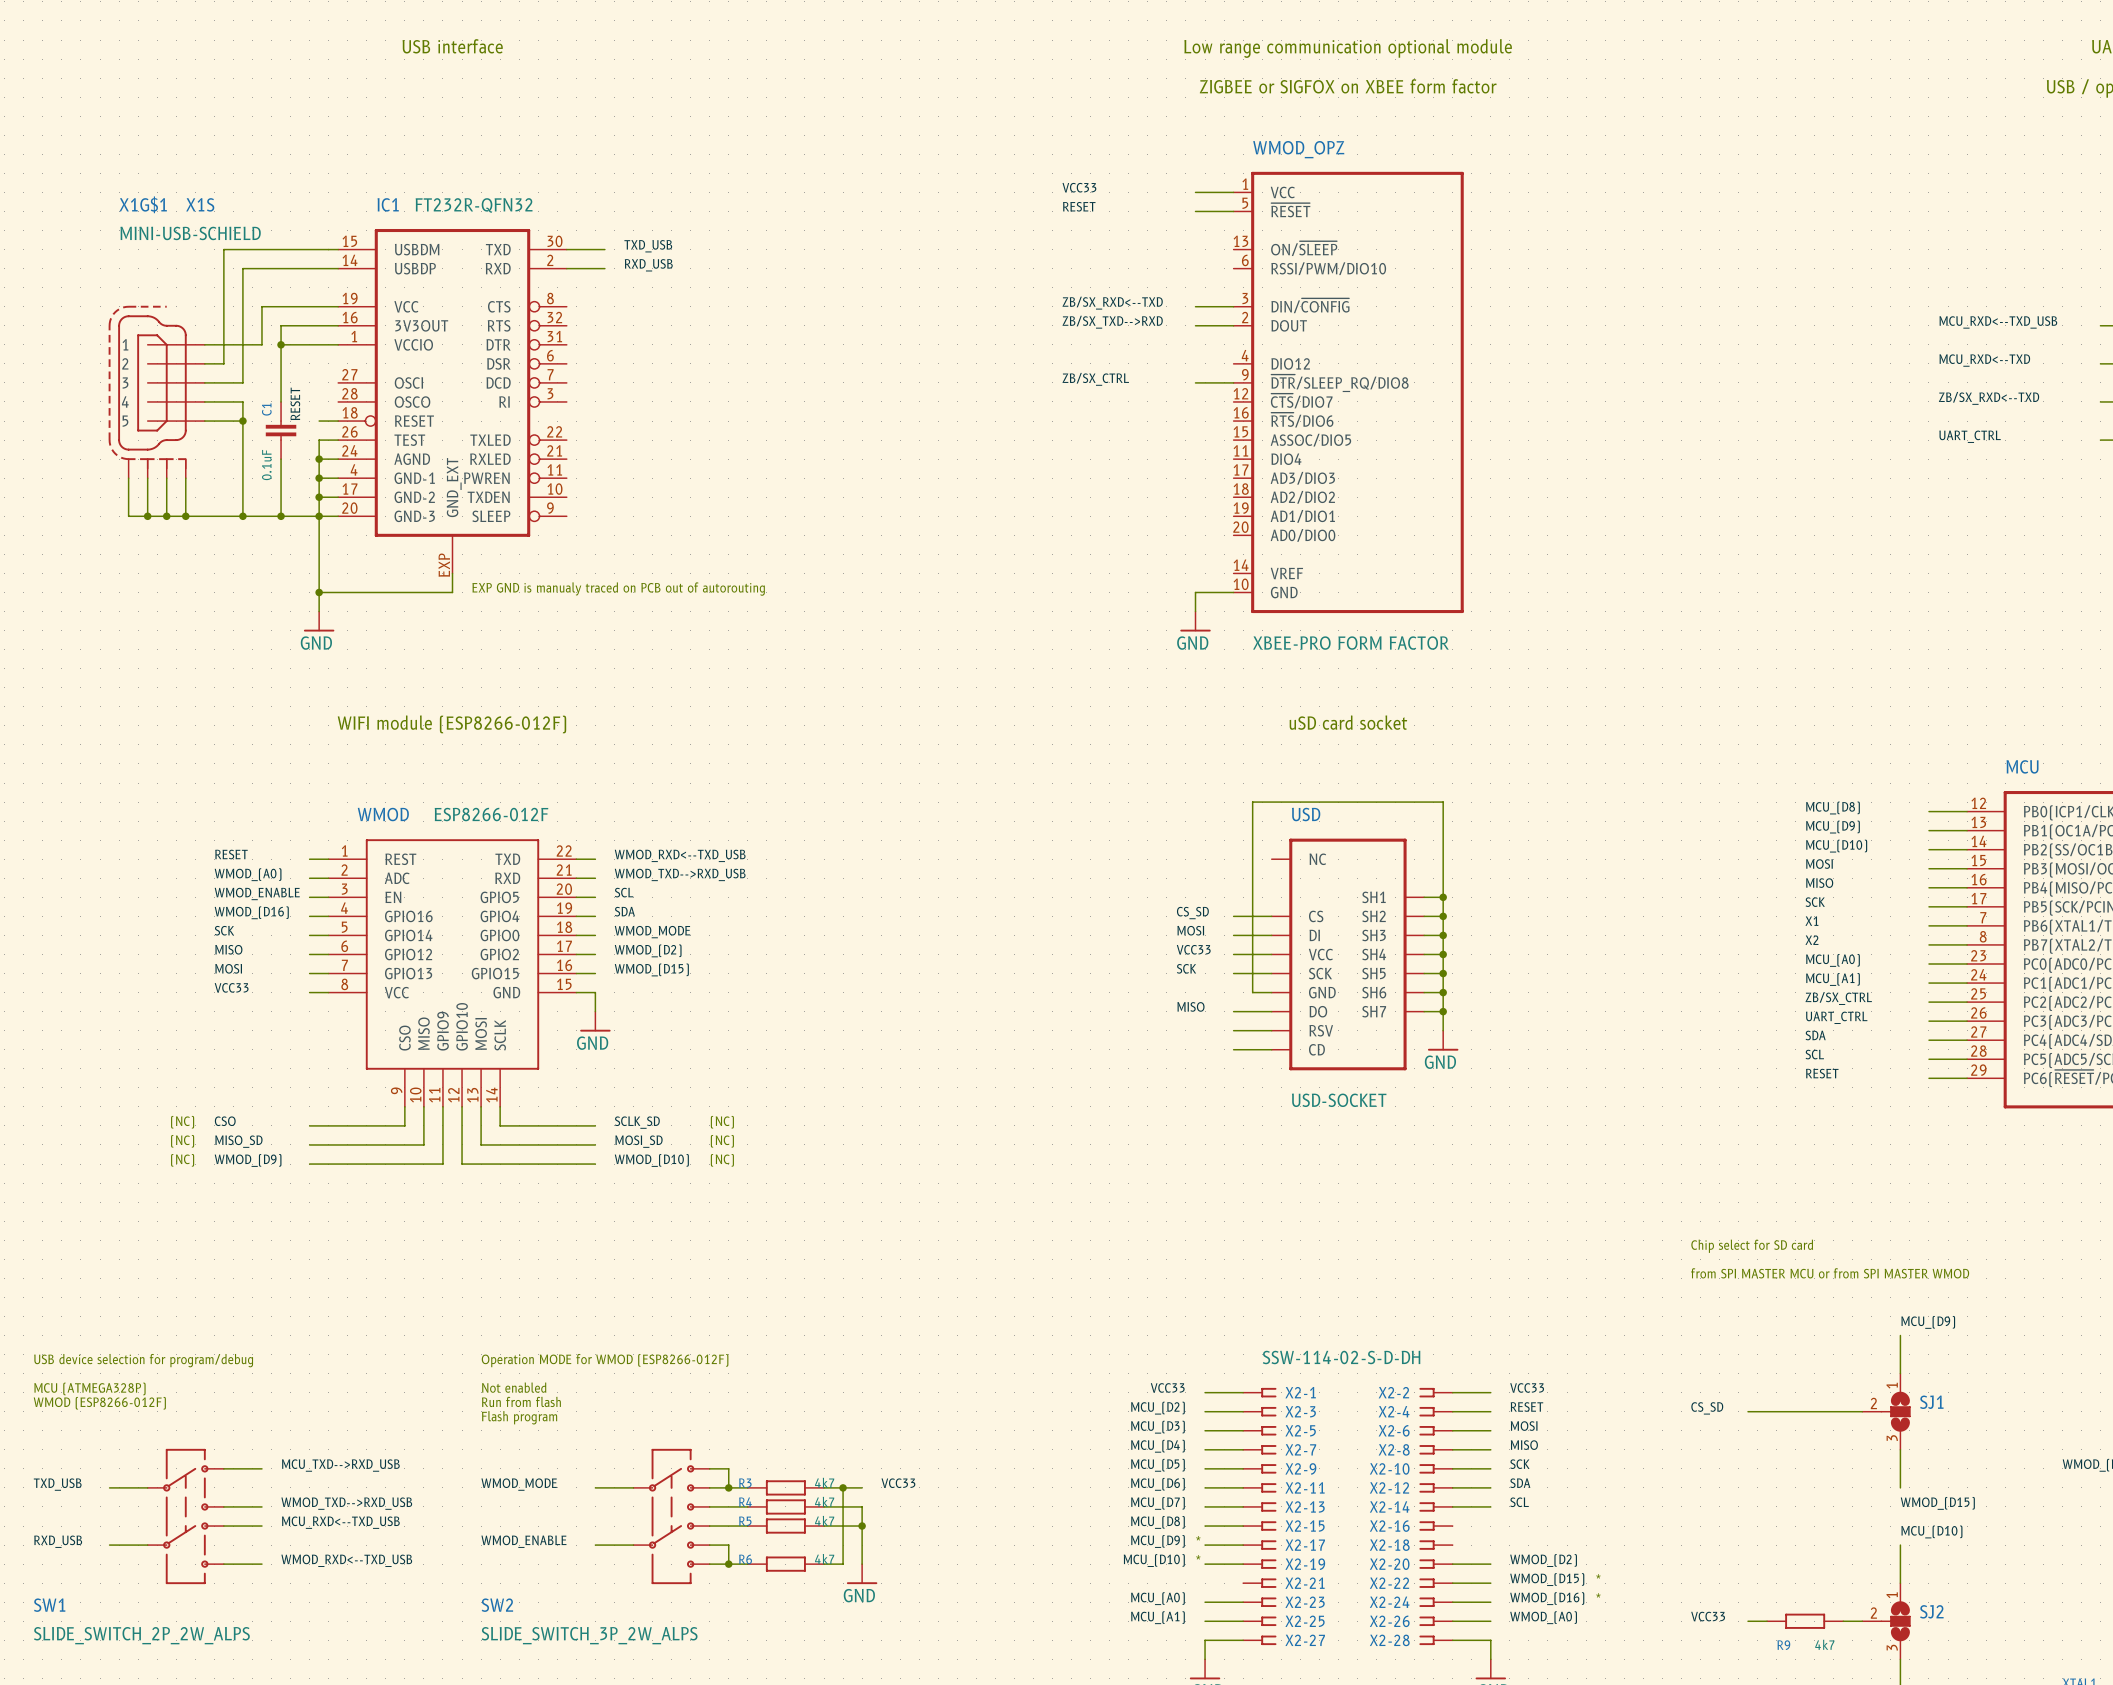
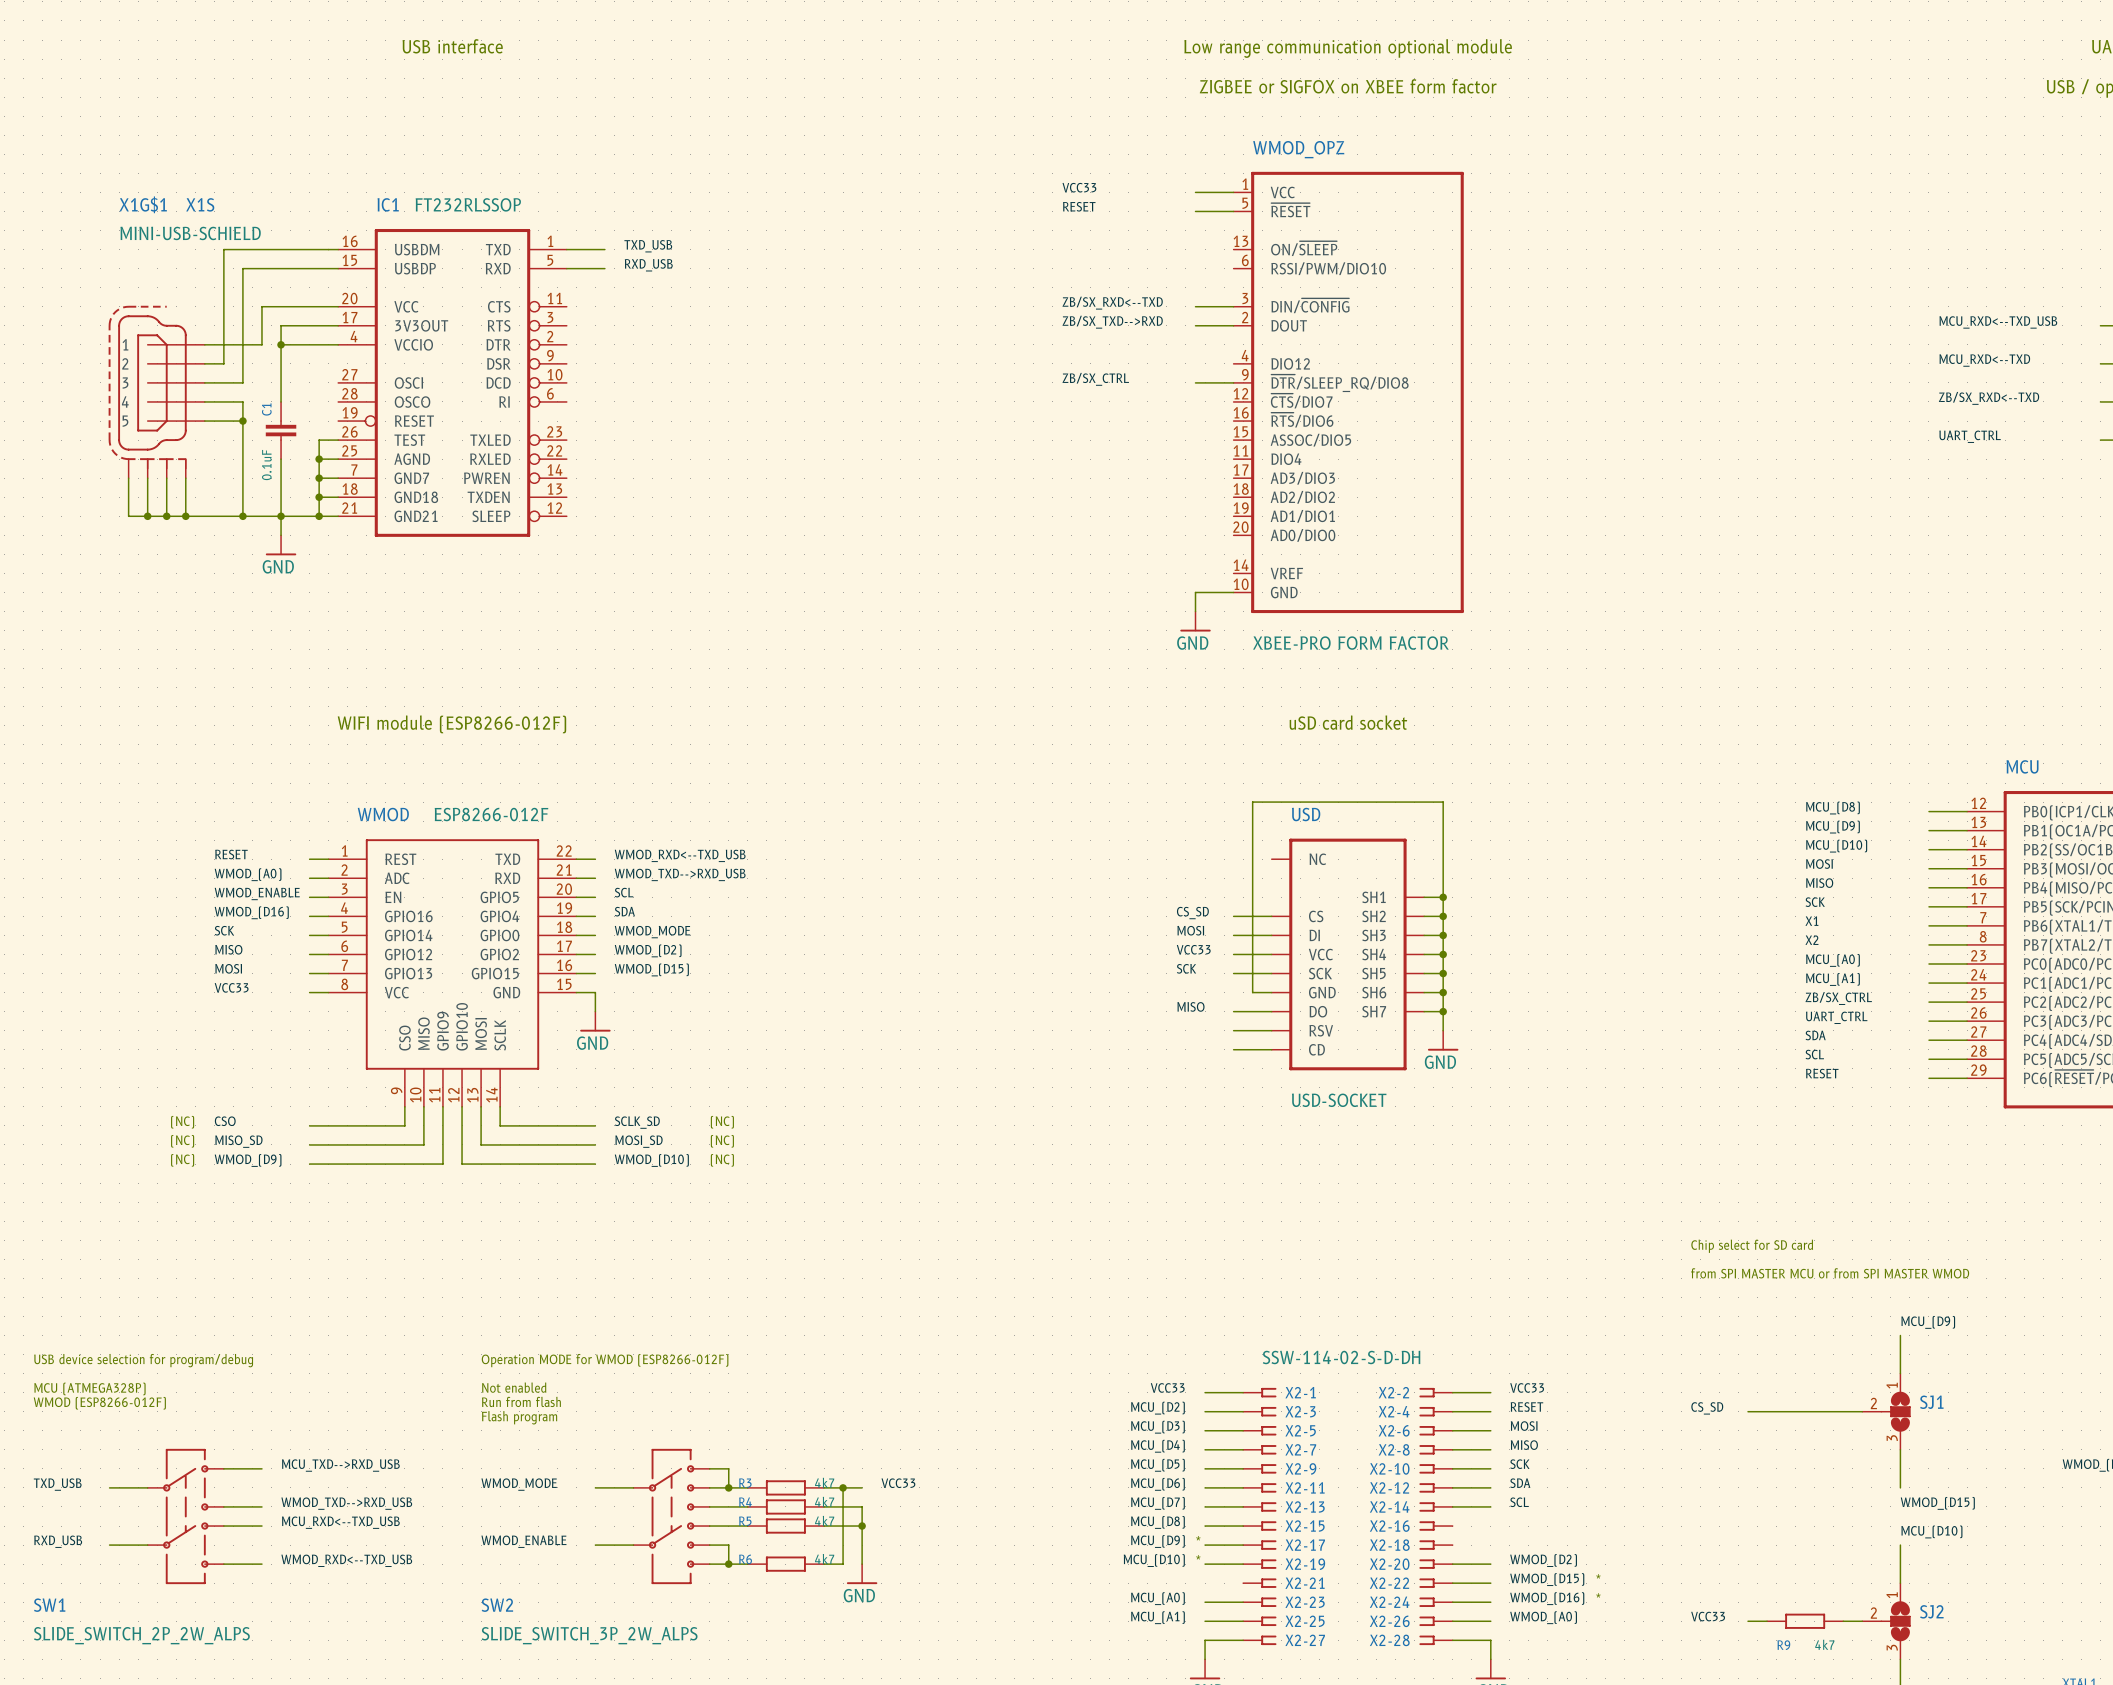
IC1 value: FT232R-QFN32 (474, 205) -> FT232RLSSOP (468, 204)
IC1 symbol: [338, 228, 567, 574] -> [338, 228, 567, 537]
label: RESET (295, 403) -> none
wire: (319, 421) (338, 421) -> none
wire: none -> (281, 516) (281, 535)
wire: (319, 516) (319, 611) -> none
wire: (452, 573) (452, 592) (319, 592) -> none
text: EXP GND is manualy traced on PCB out of autorouting (618, 589) -> none
junction: (319, 592) -> none
power symbol position: GND (319, 621) -> GND (281, 545)

